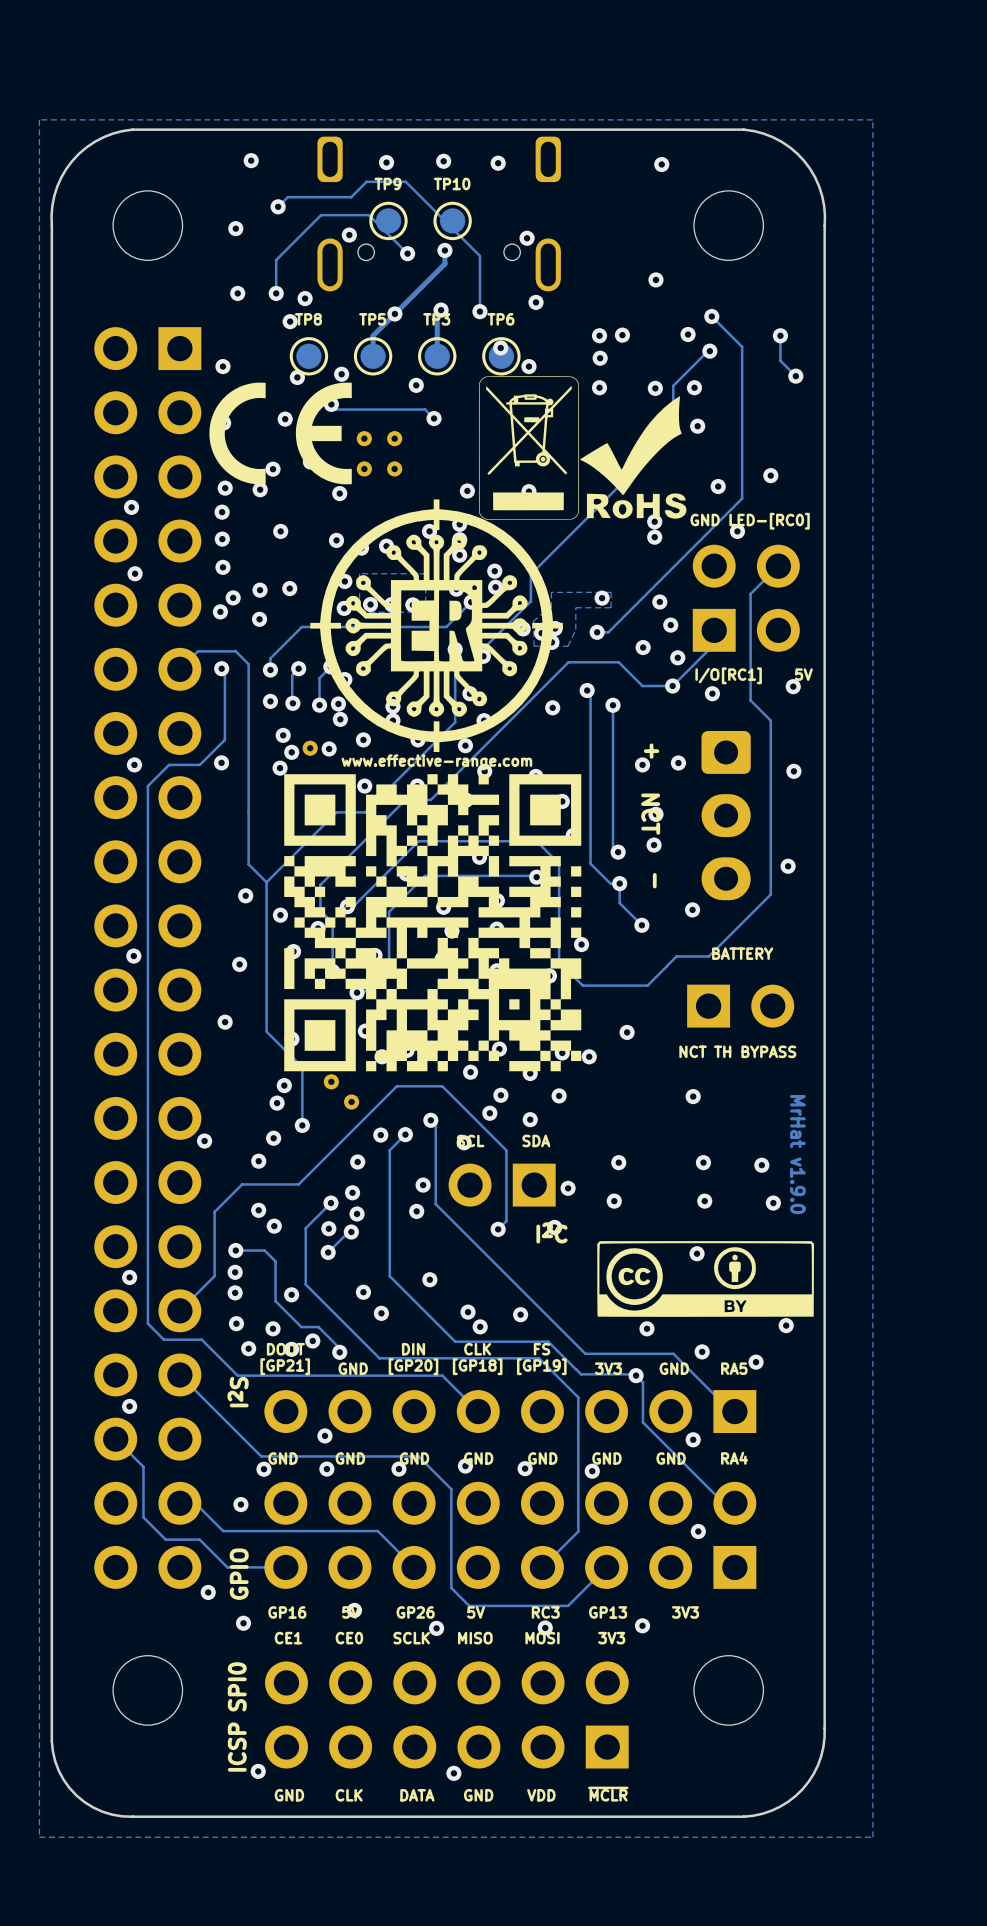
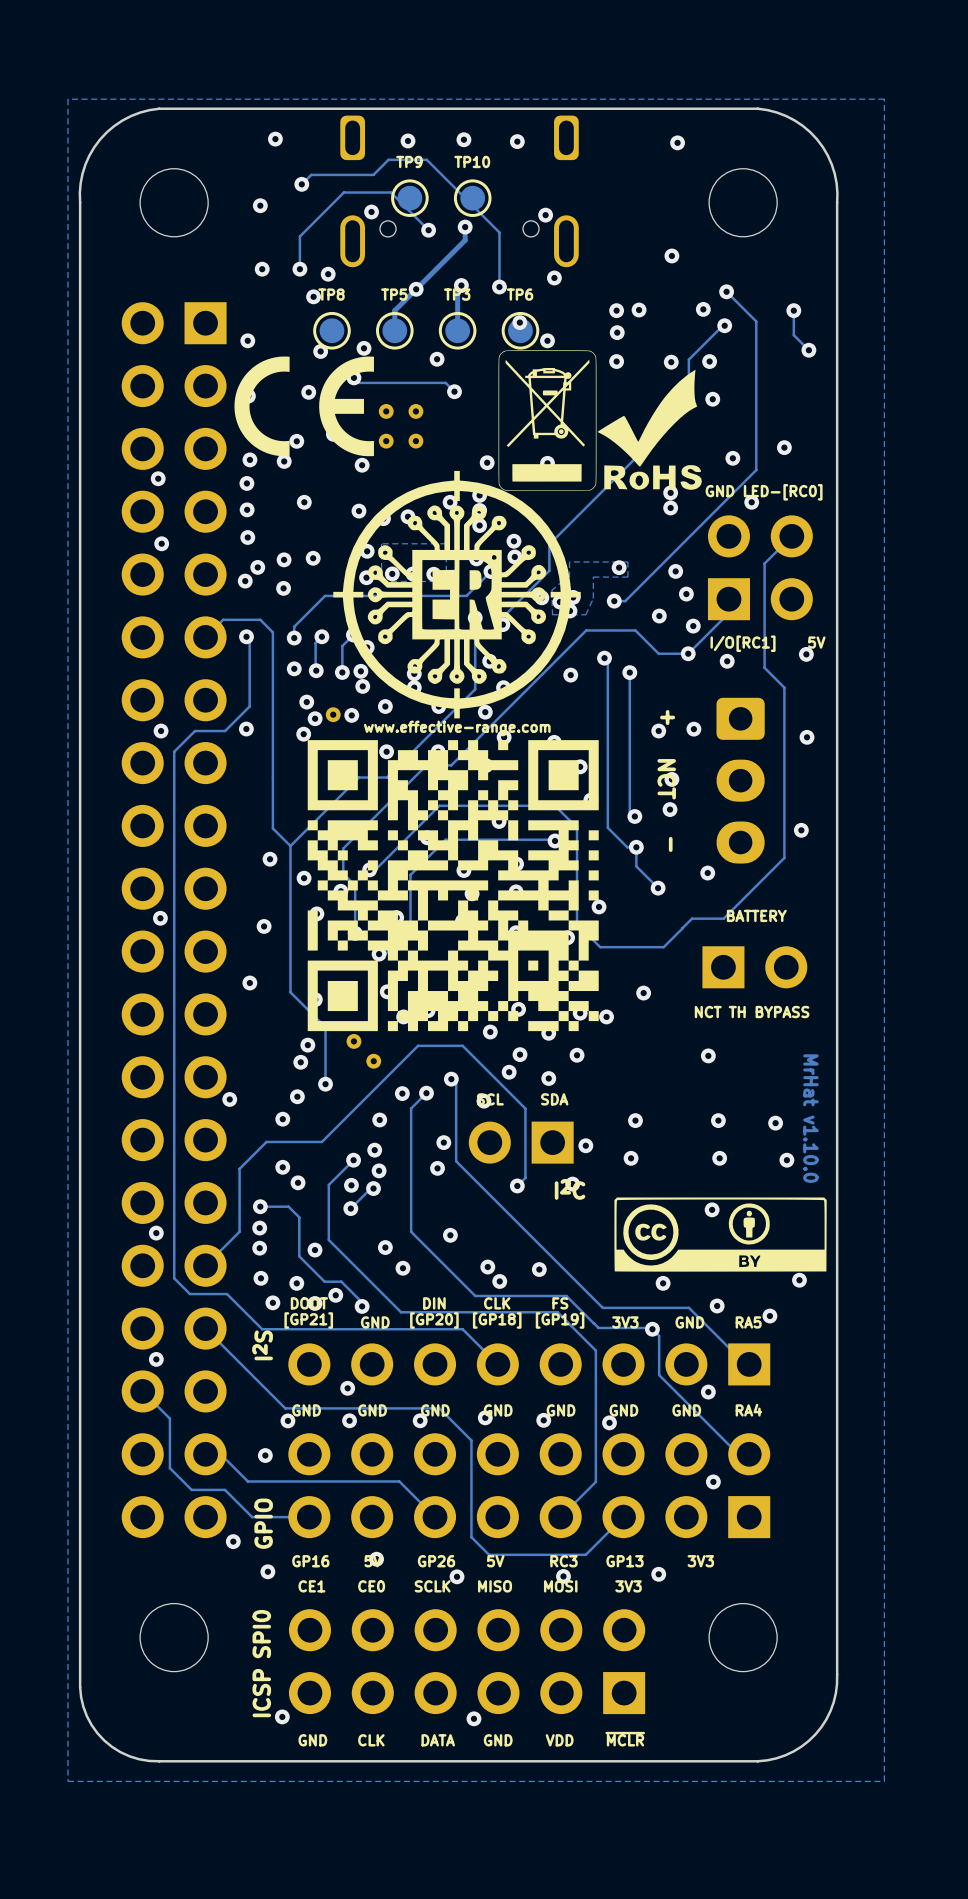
text: MrHat v1.9.0 (797, 1154) -> MrHat v1.10.0 (810, 1118)

